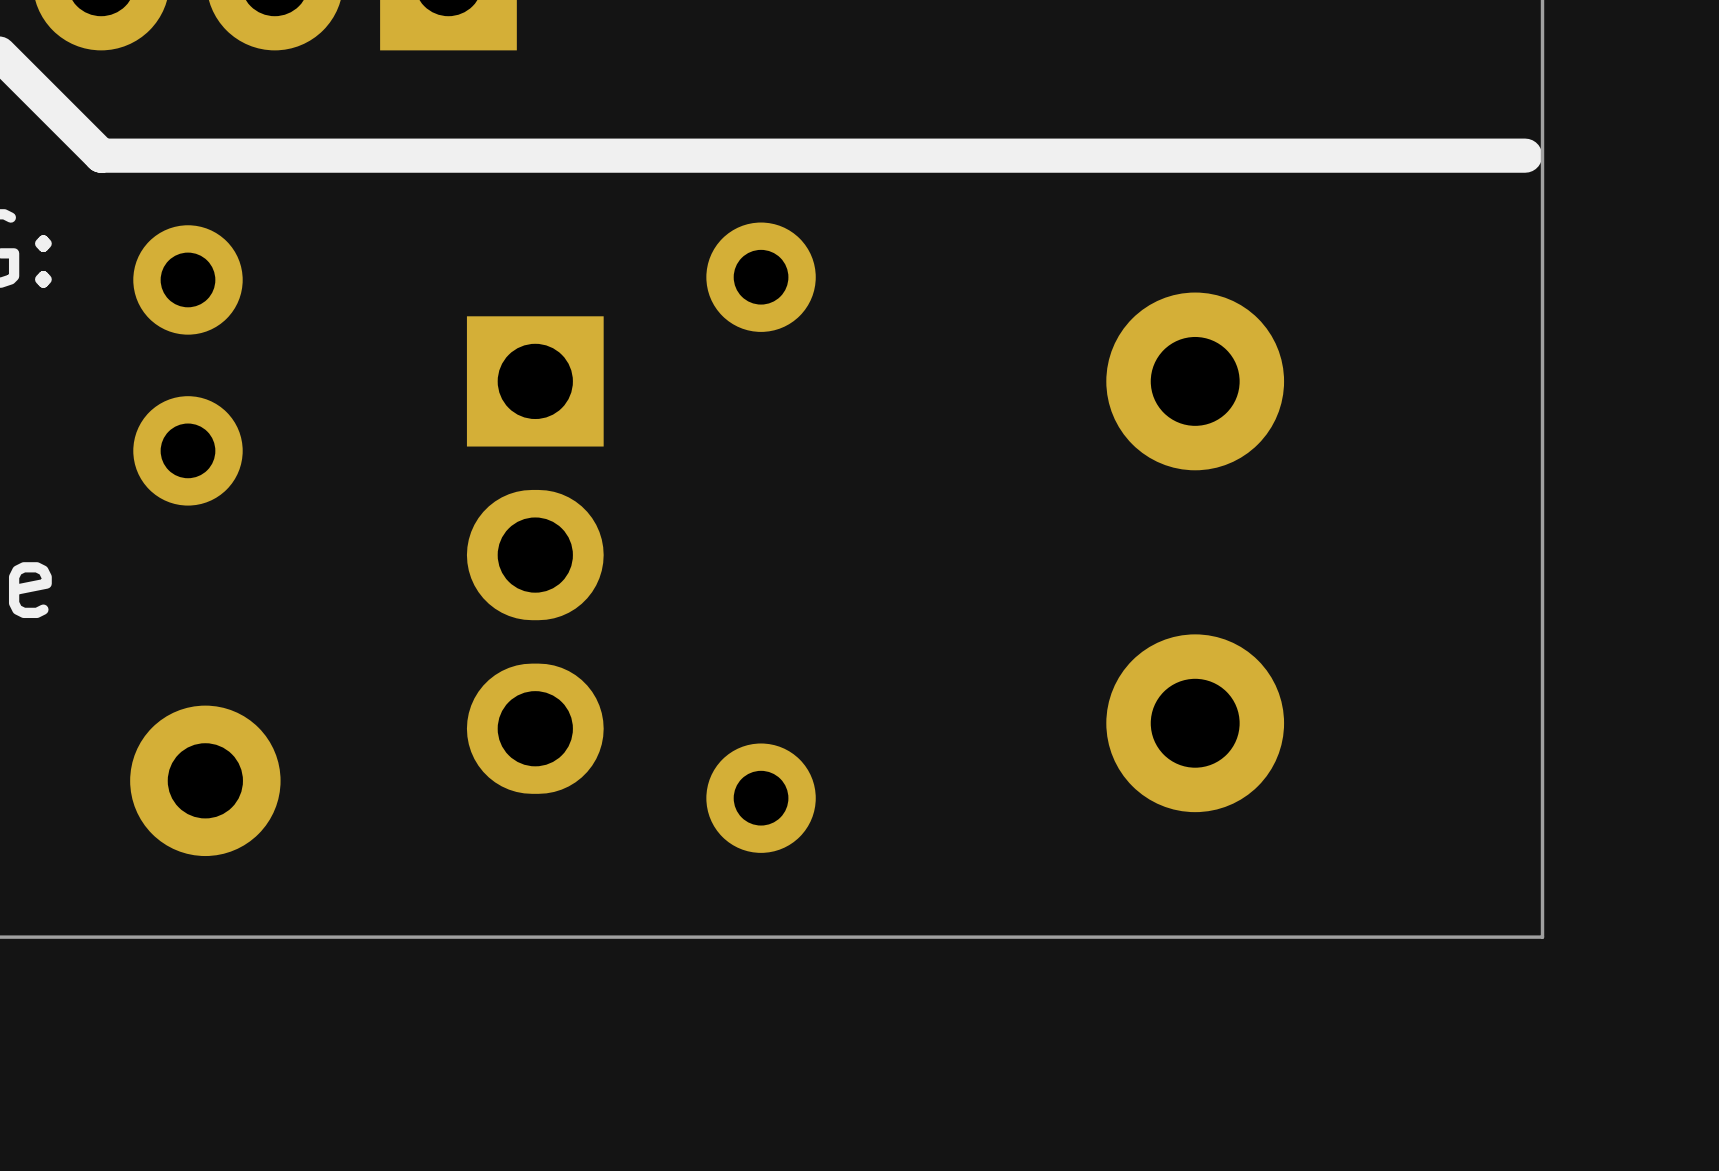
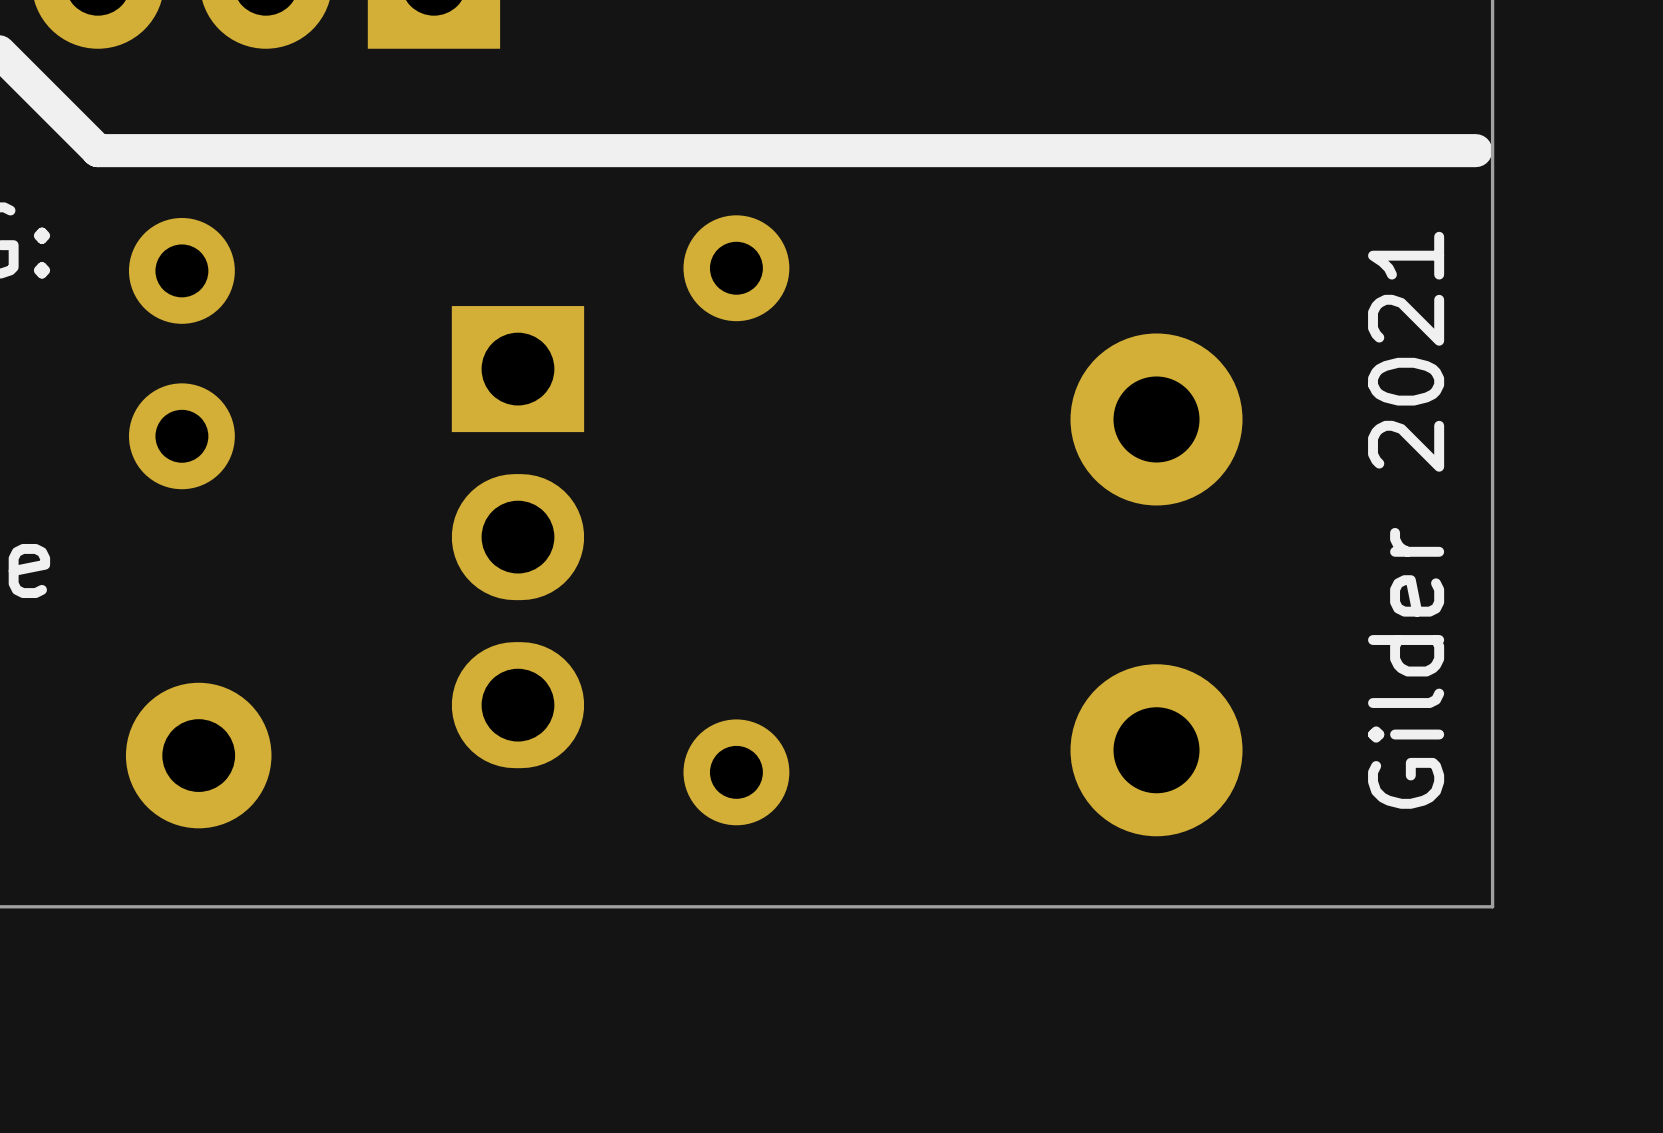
text: none -> Gilder 2021 (1406, 520)
part position: (1195, 552) -> (1156, 584)

